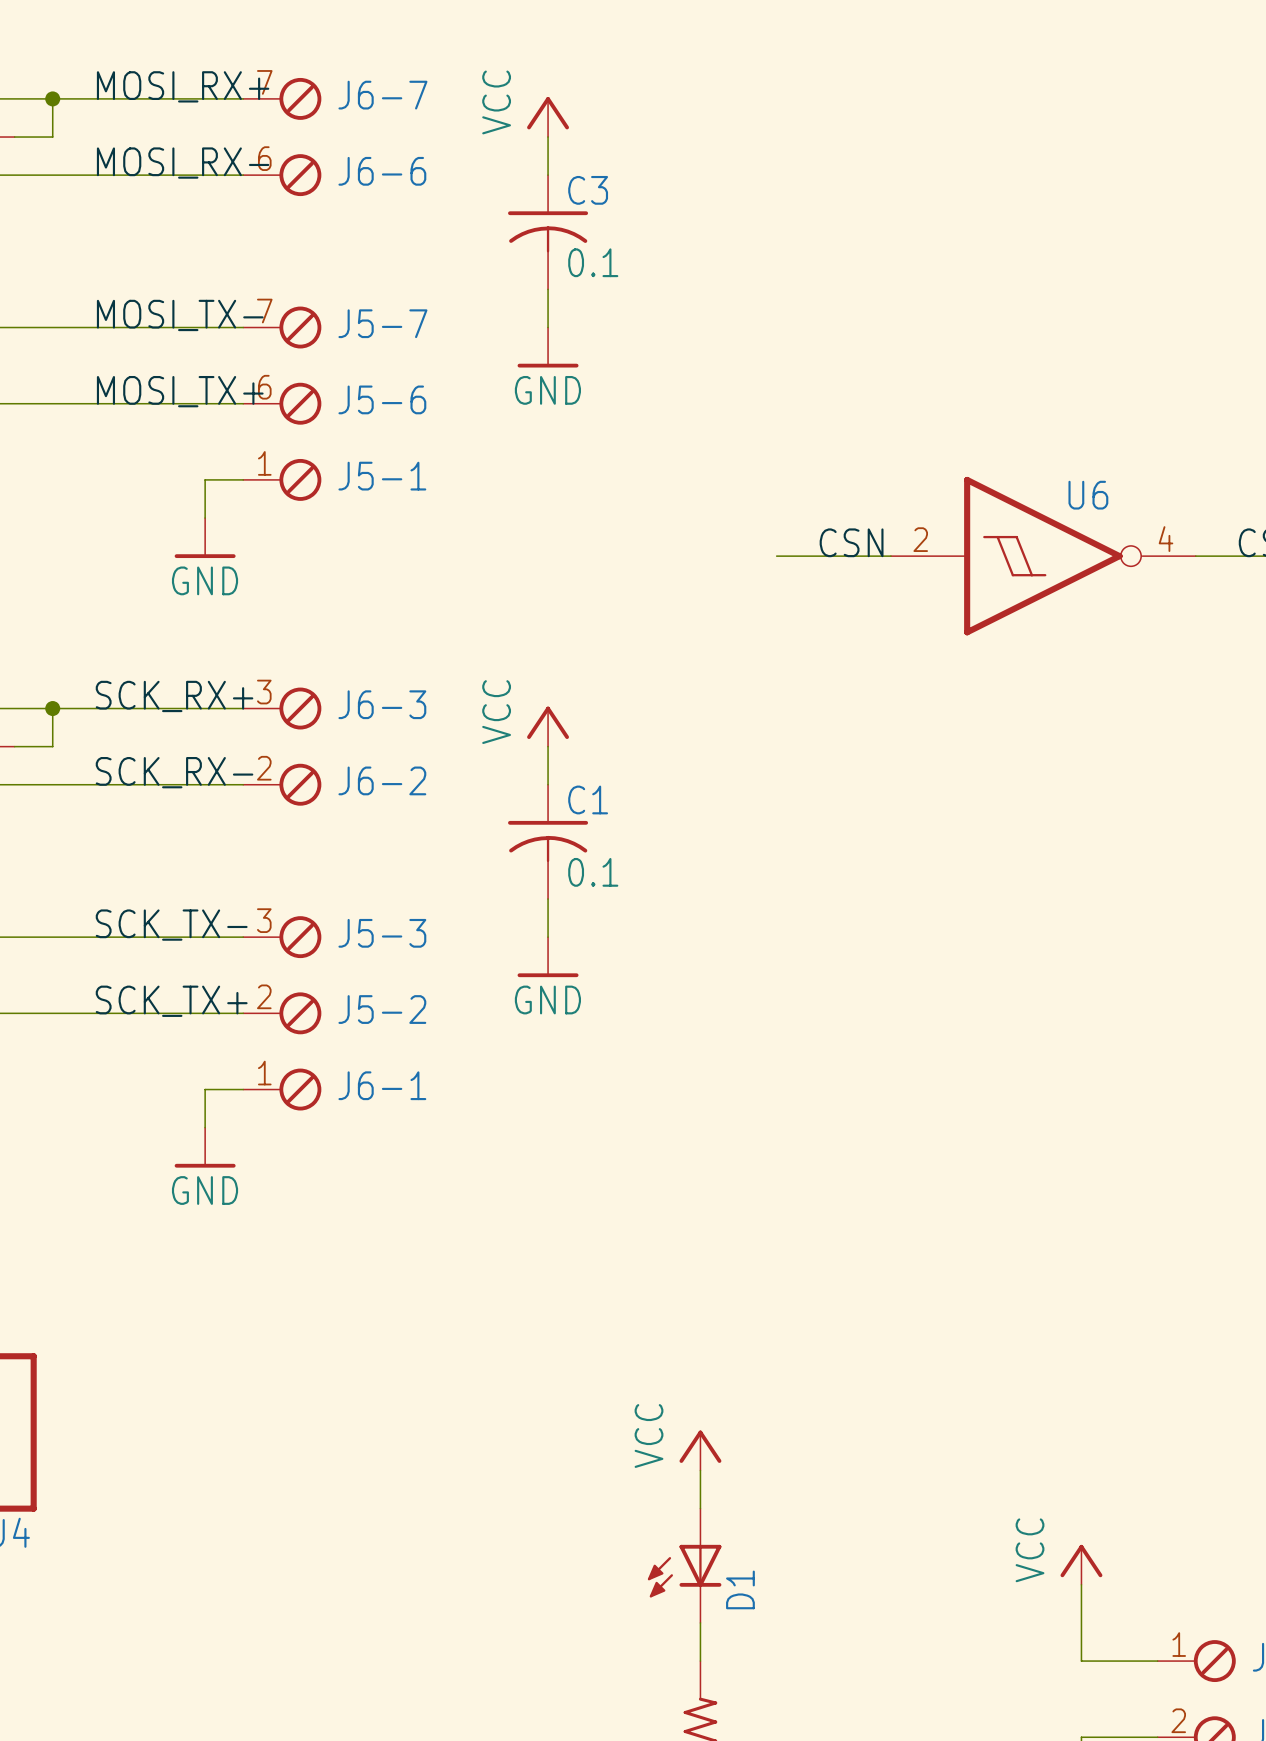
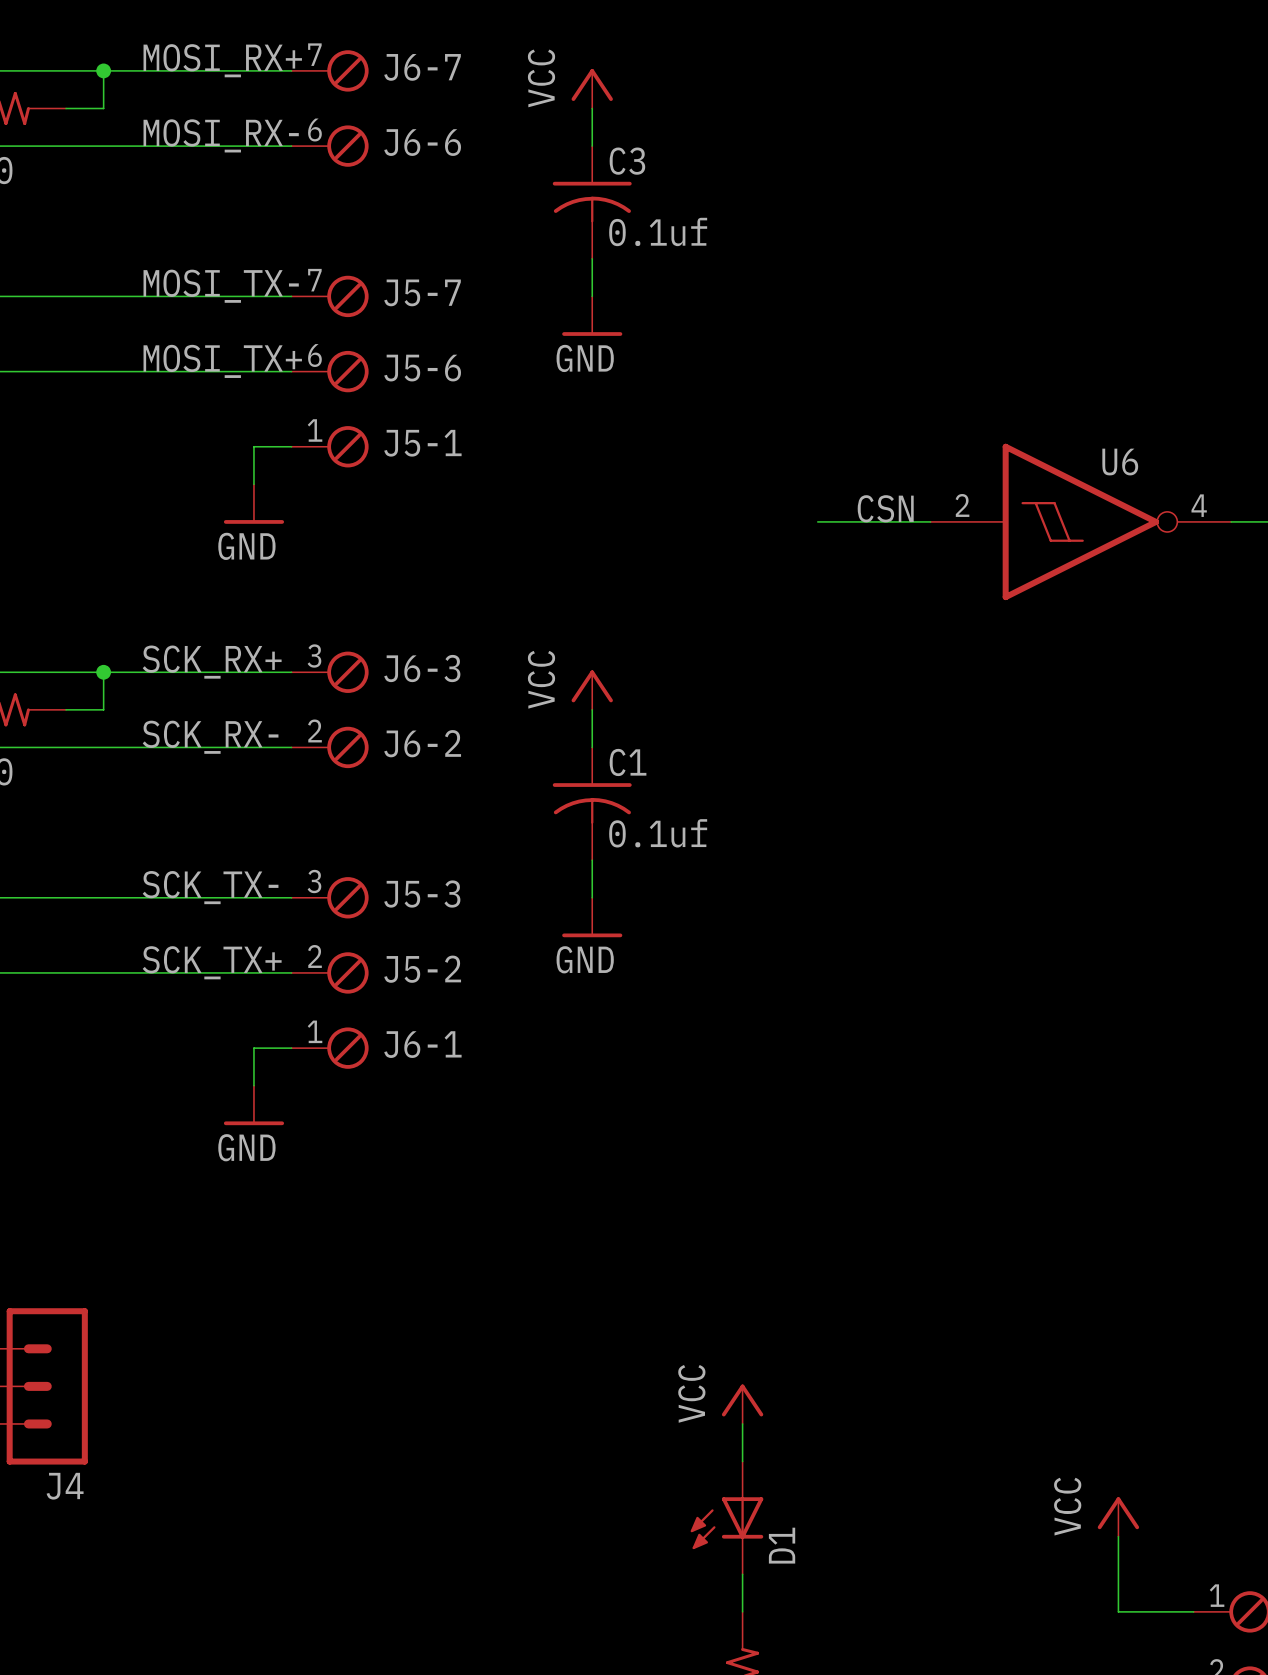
C3 value: 0.1 (593, 262) -> 0.1uf (658, 231)
C1 value: 0.1 (593, 872) -> 0.1uf (658, 833)

